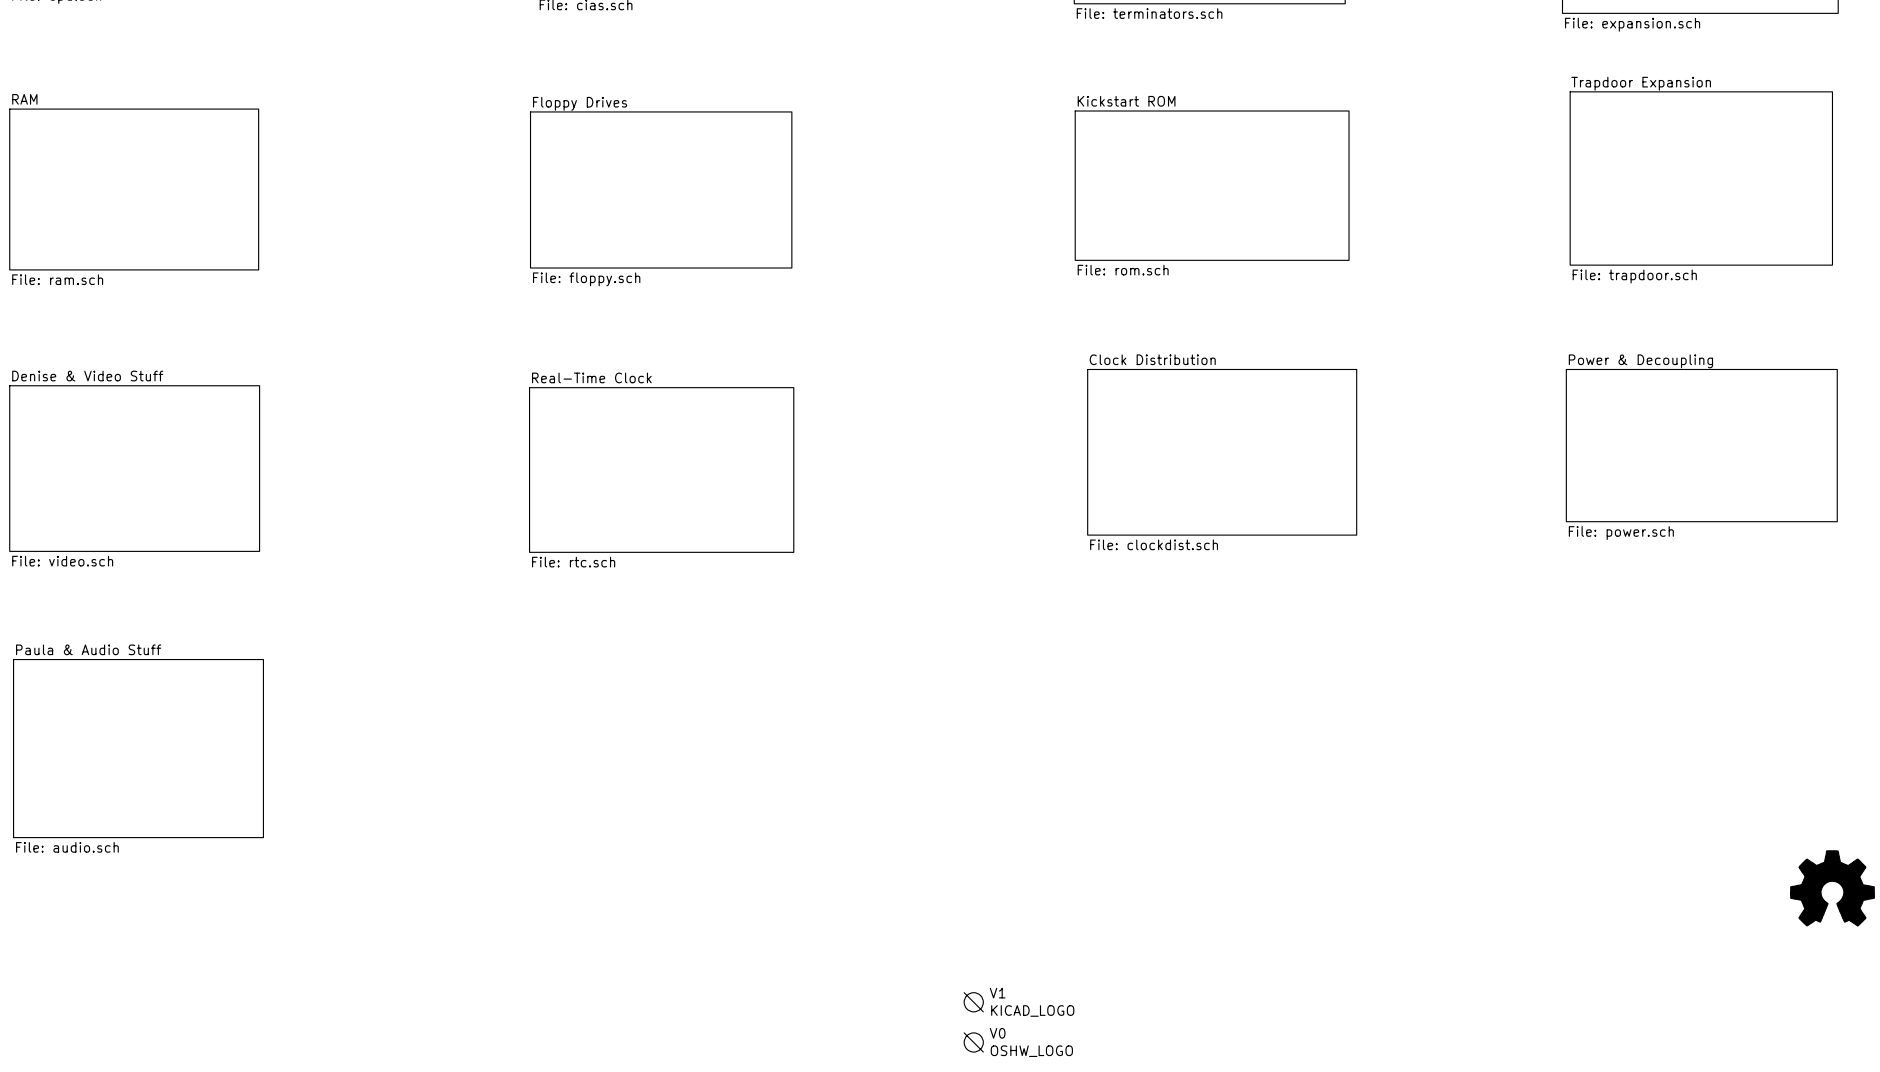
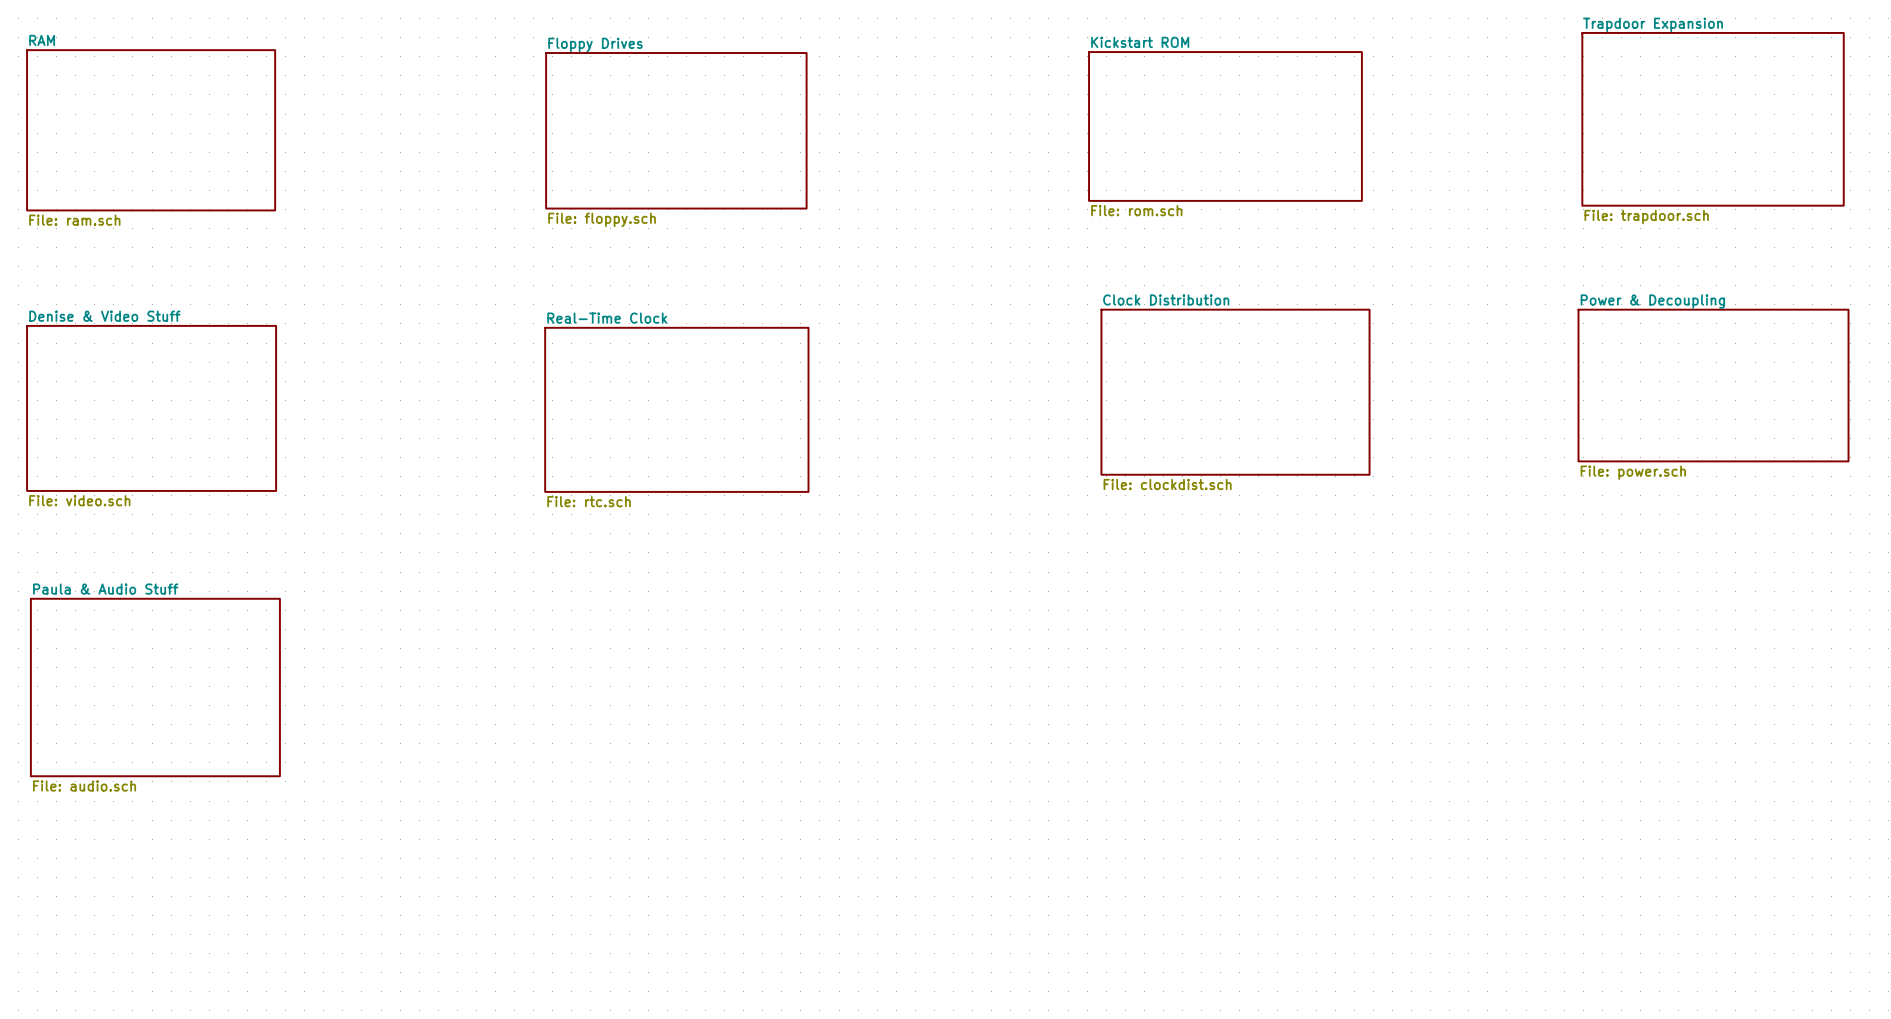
power symbol: (1832, 888) -> none
V1: KICAD_LOGO (973, 1002) -> none
V0: OSHW_LOGO (973, 1042) -> none

